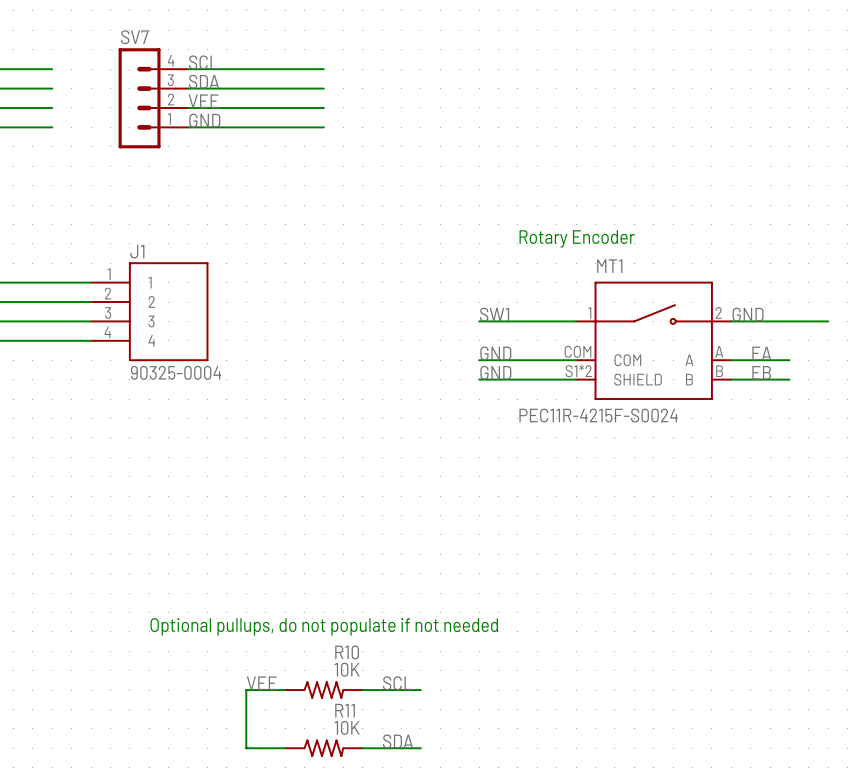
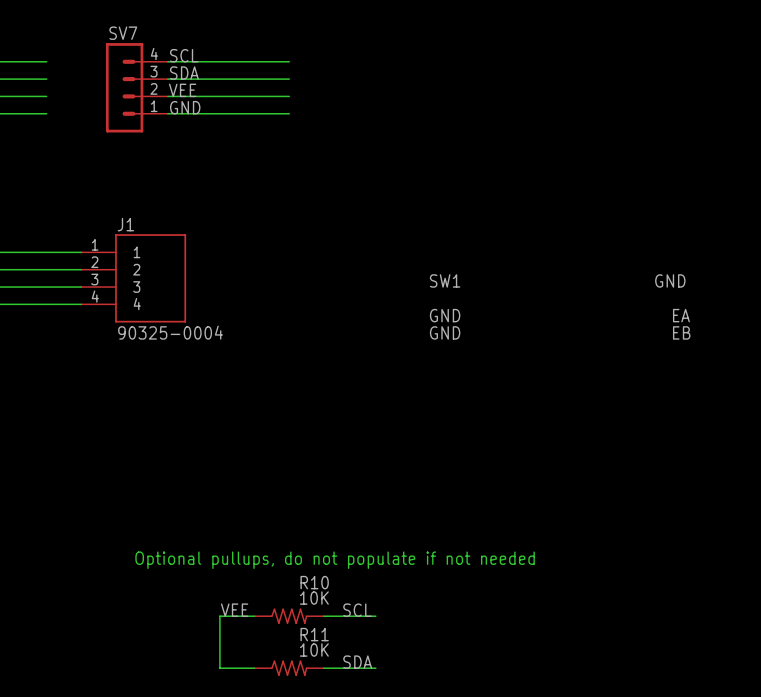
text: Rotary Encoder (577, 238) -> none
wire: (479, 321) (576, 321) -> none
wire: (731, 321) (828, 321) -> none
MT1: PEC11R-4215F-S0024 (653, 340) -> none
wire: (479, 360) (576, 360) -> none
wire: (731, 360) (789, 360) -> none
wire: (479, 379) (576, 379) -> none
wire: (731, 379) (789, 379) -> none

